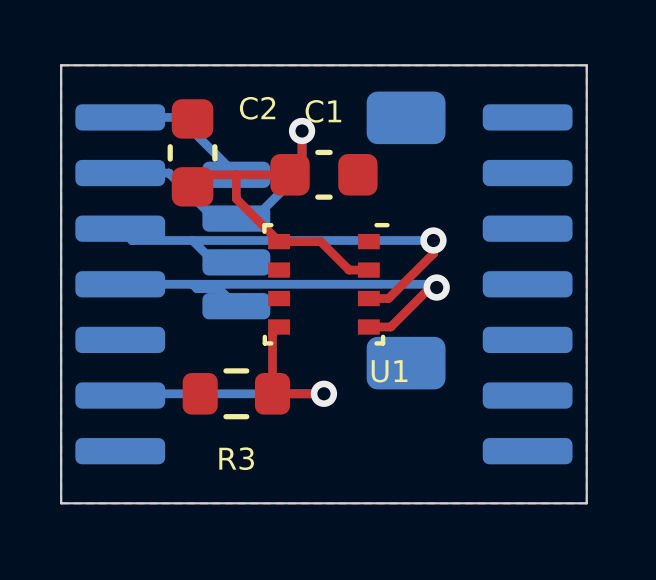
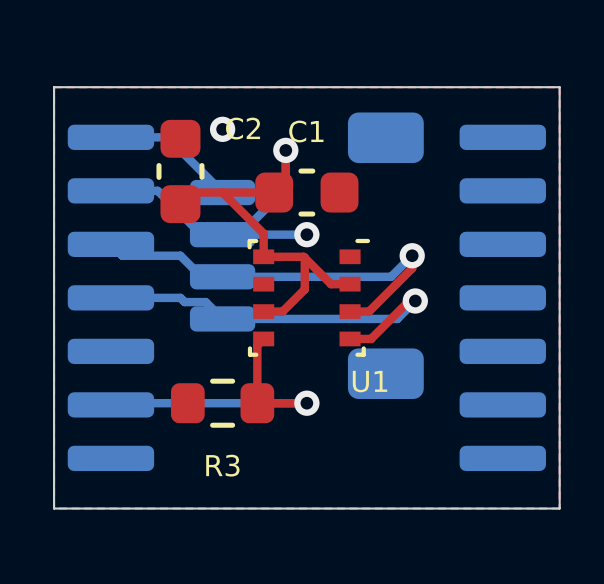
via: none -> (222, 129)
top track: (236, 174) (236, 198) (279, 241) -> (222, 192) (263, 233) (263, 256)
bottom track: none -> (239, 234) (306, 234)
via: none -> (306, 234)
bottom track: (192, 240) (433, 240) -> (222, 276) (391, 276) (412, 255)
top track: none -> (304, 257) (304, 289) (282, 311) (263, 311)
bottom track: (192, 284) (433, 284) (436, 287) -> (222, 318) (397, 318) (415, 300)

